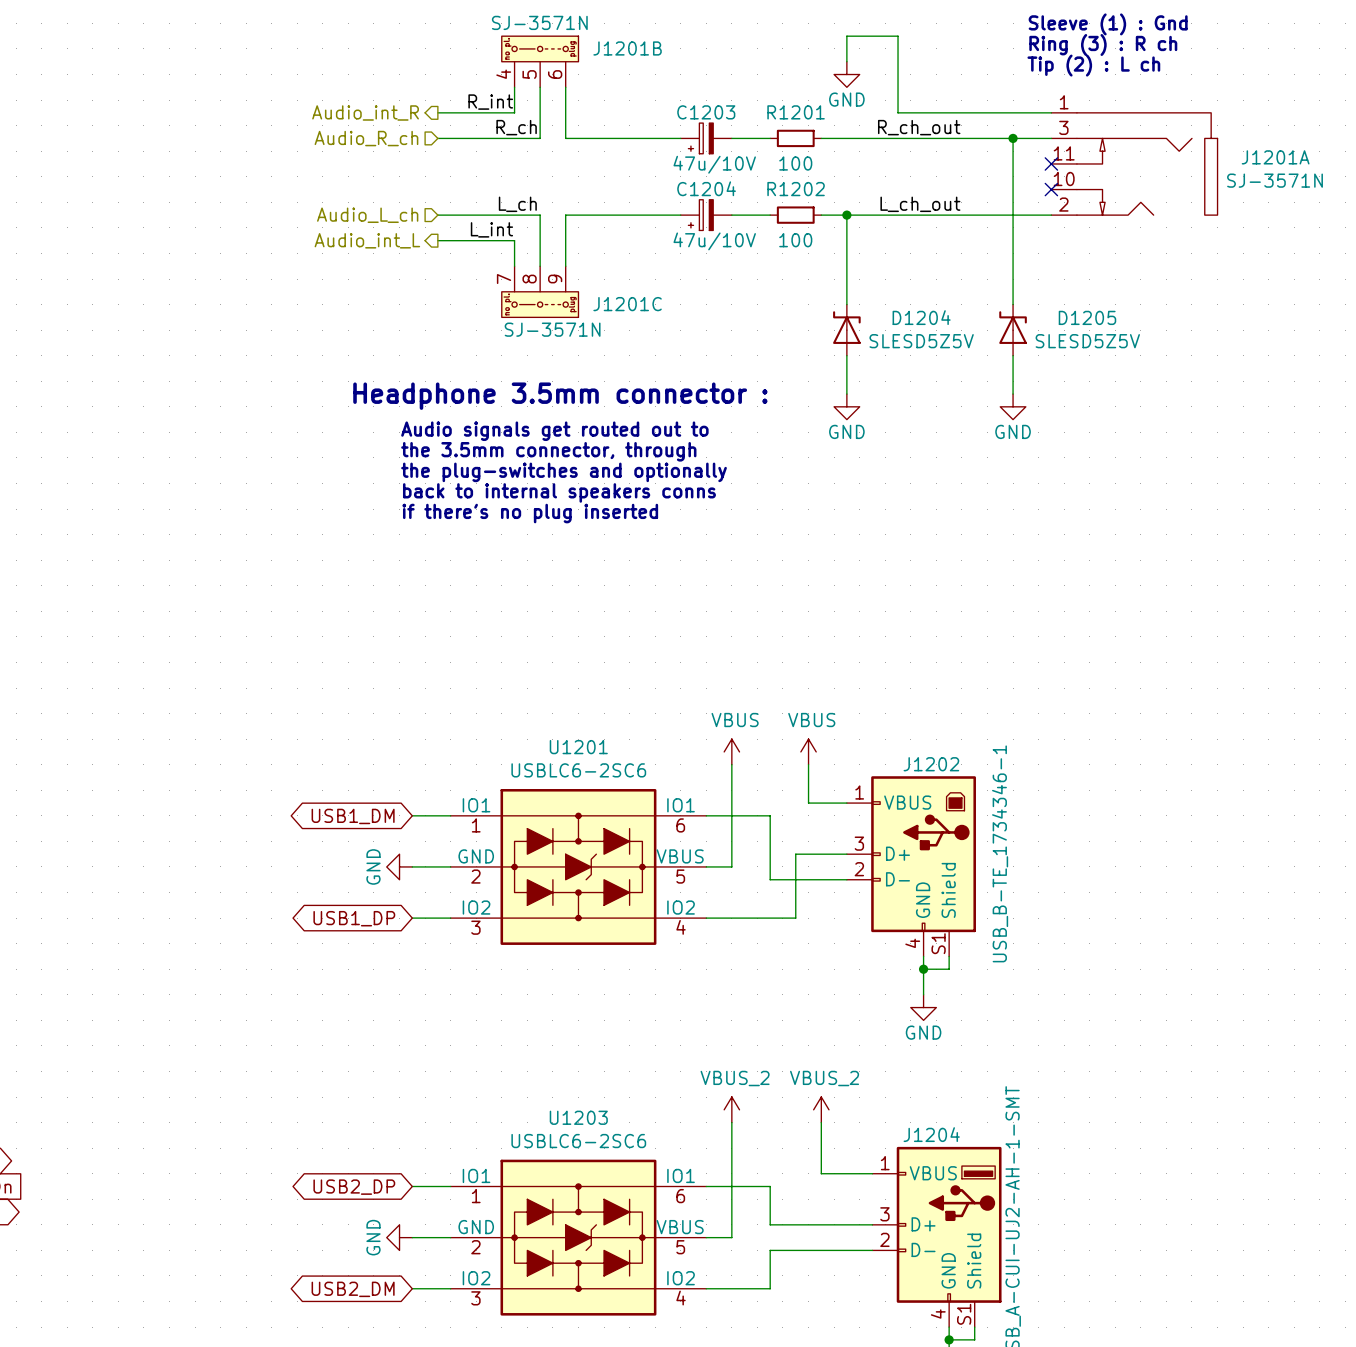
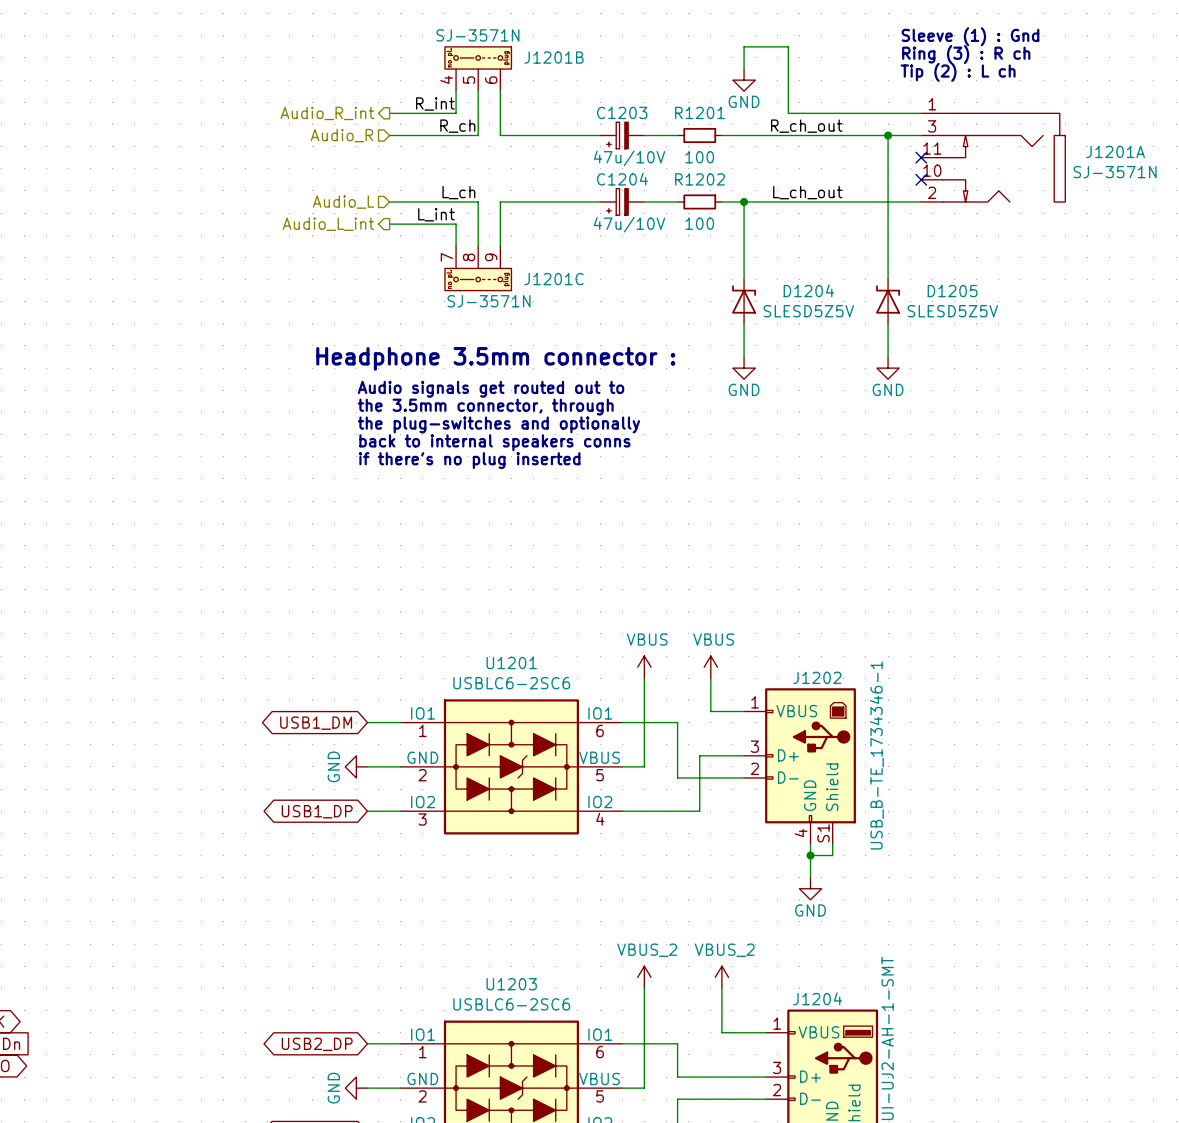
hierarchical label: Audio_int_R (365, 112) -> Audio_R_int (327, 113)
hierarchical label: Audio_R_ch (366, 138) -> Audio_R (341, 135)
hierarchical label: Audio_L_ch (367, 215) -> Audio_L (343, 202)
hierarchical label: Audio_int_L (367, 240) -> Audio_L_int (328, 224)

